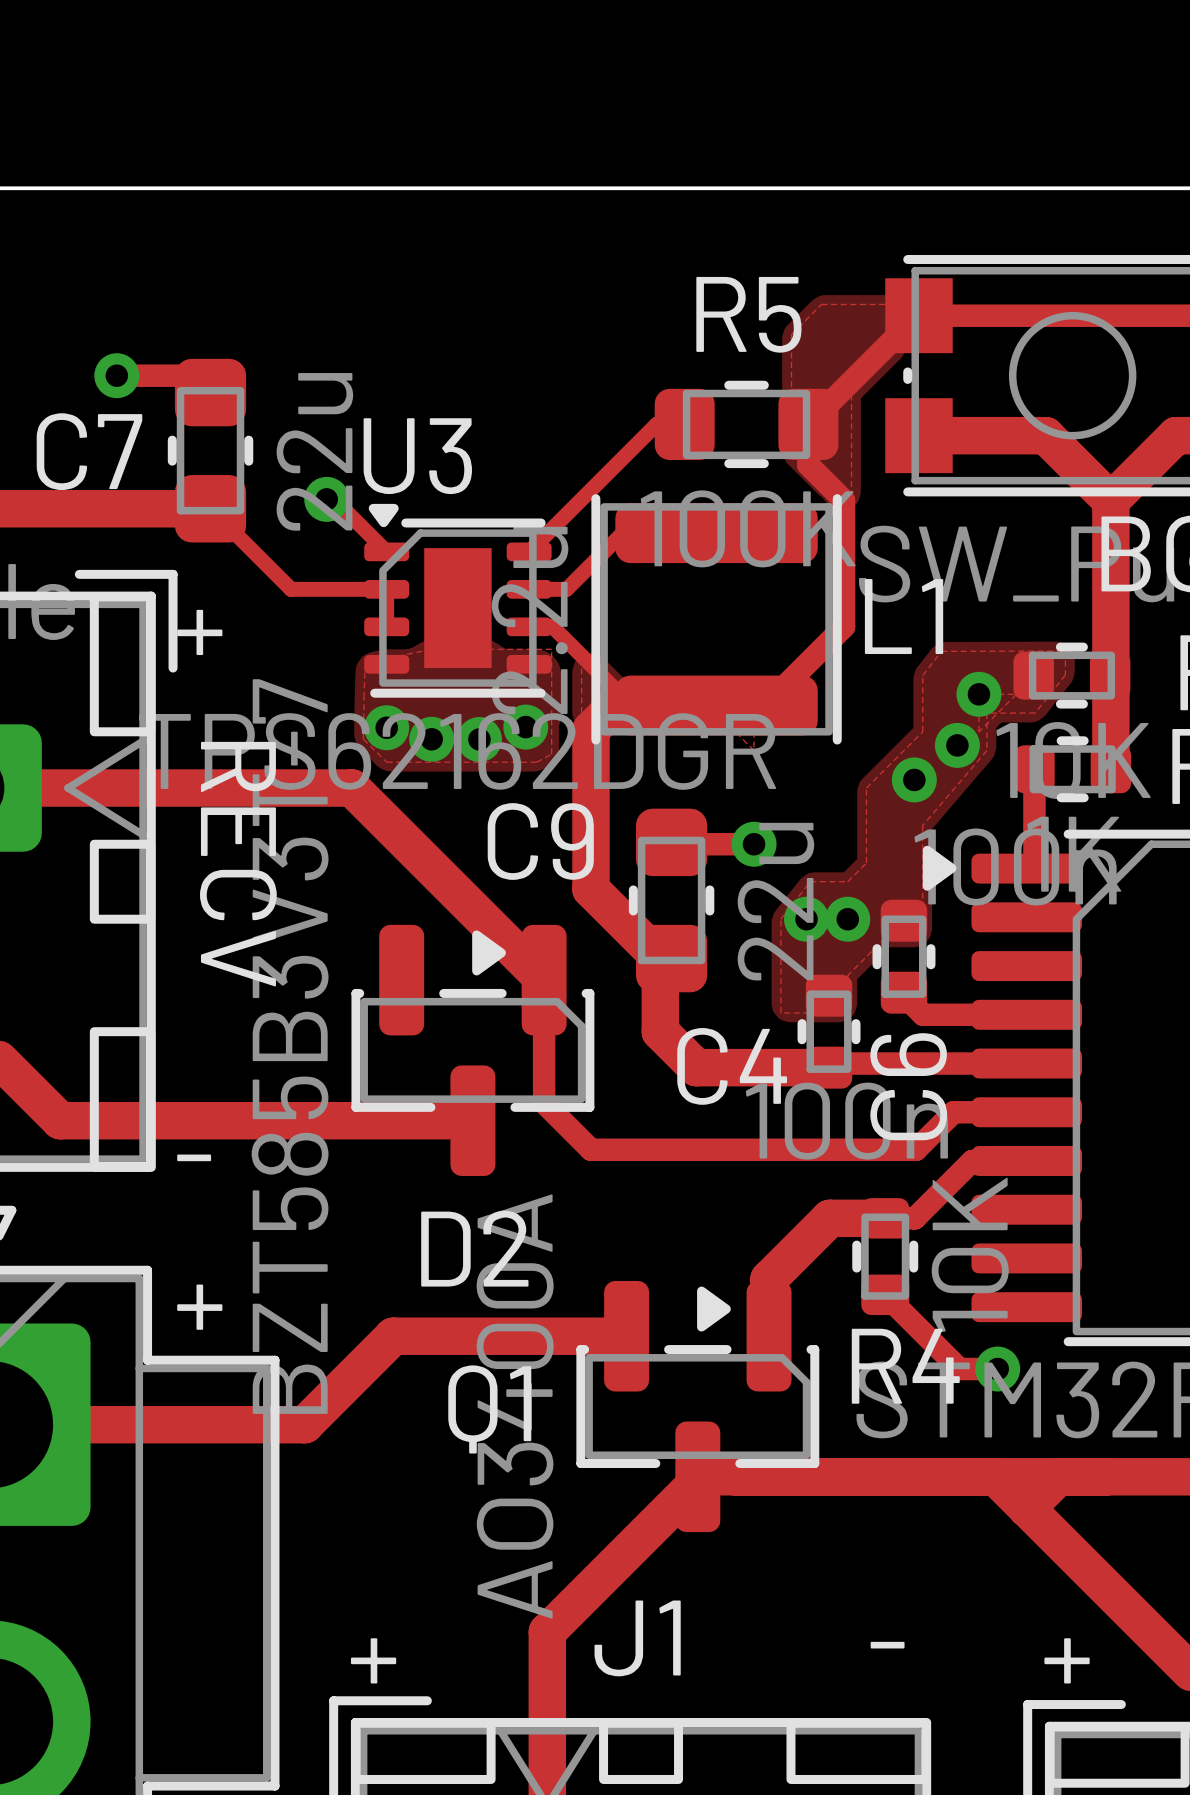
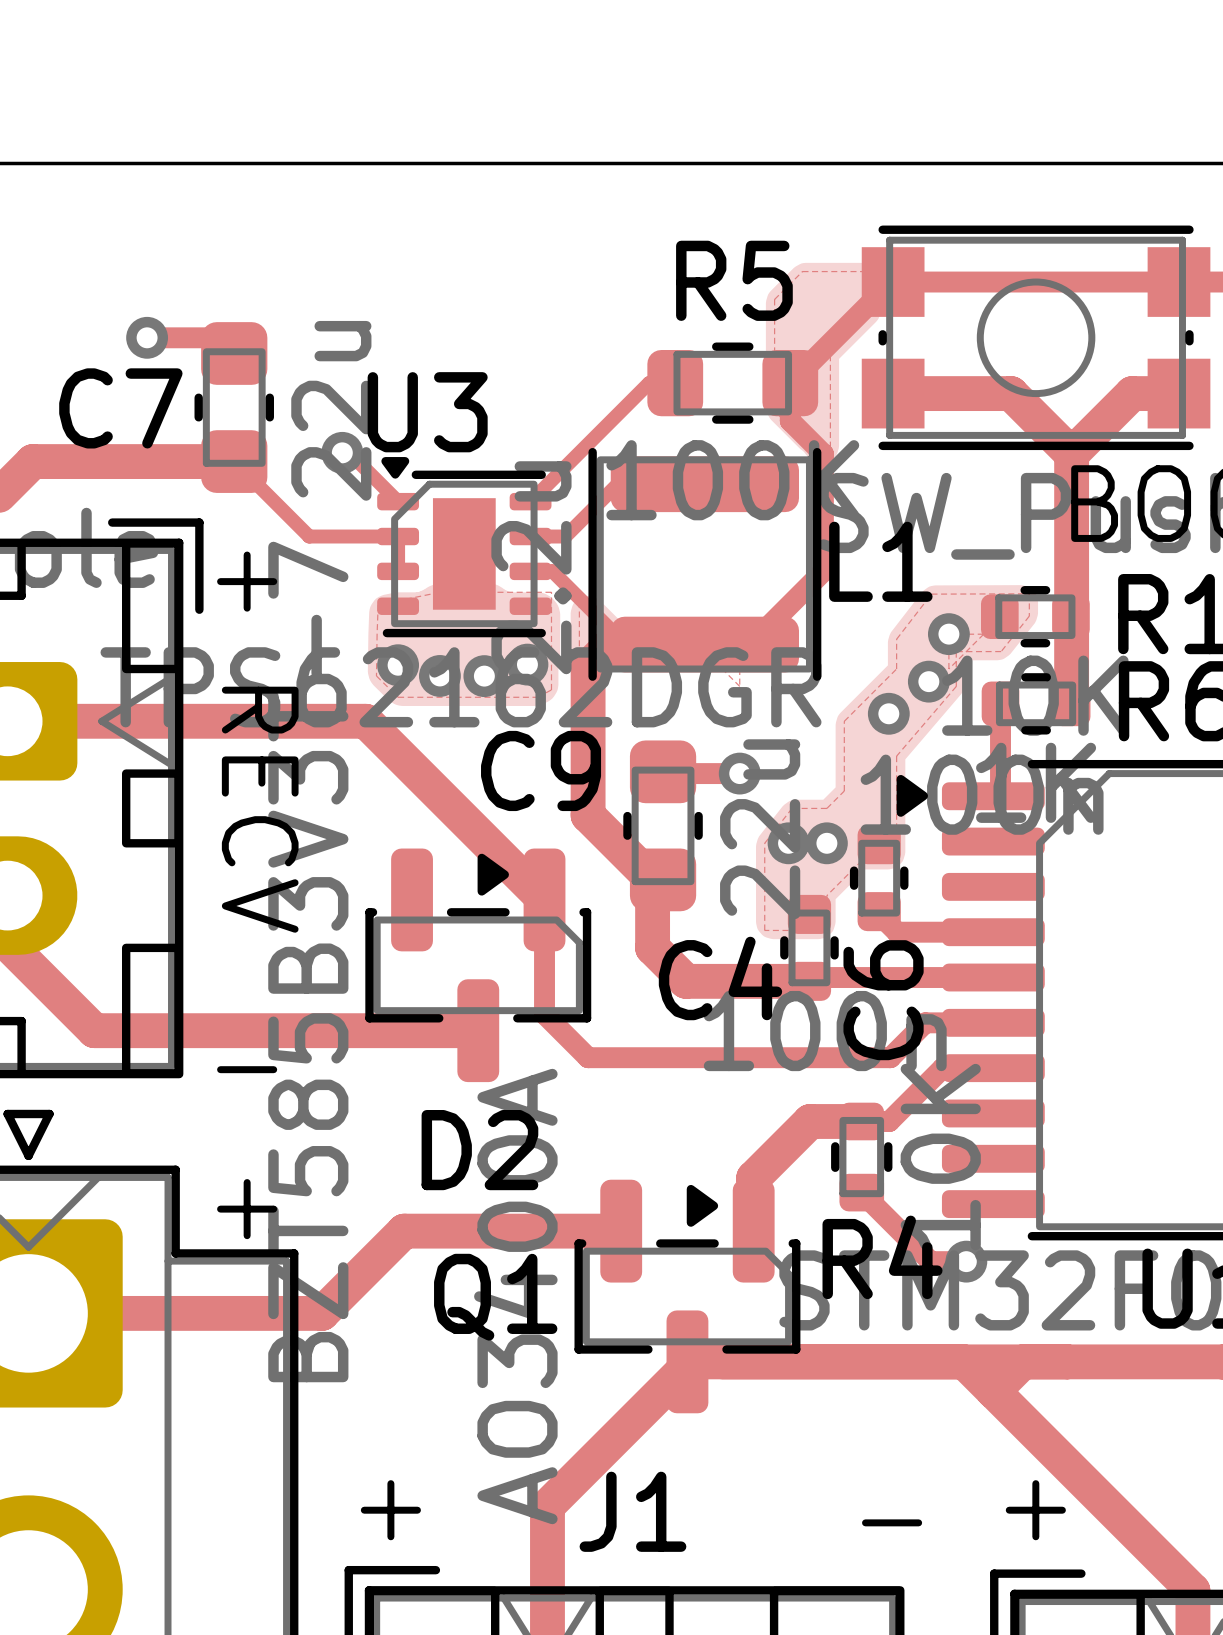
zone outline: (960, 651) (941, 651) (922, 675) (922, 699) -> (931, 594) (896, 639)

